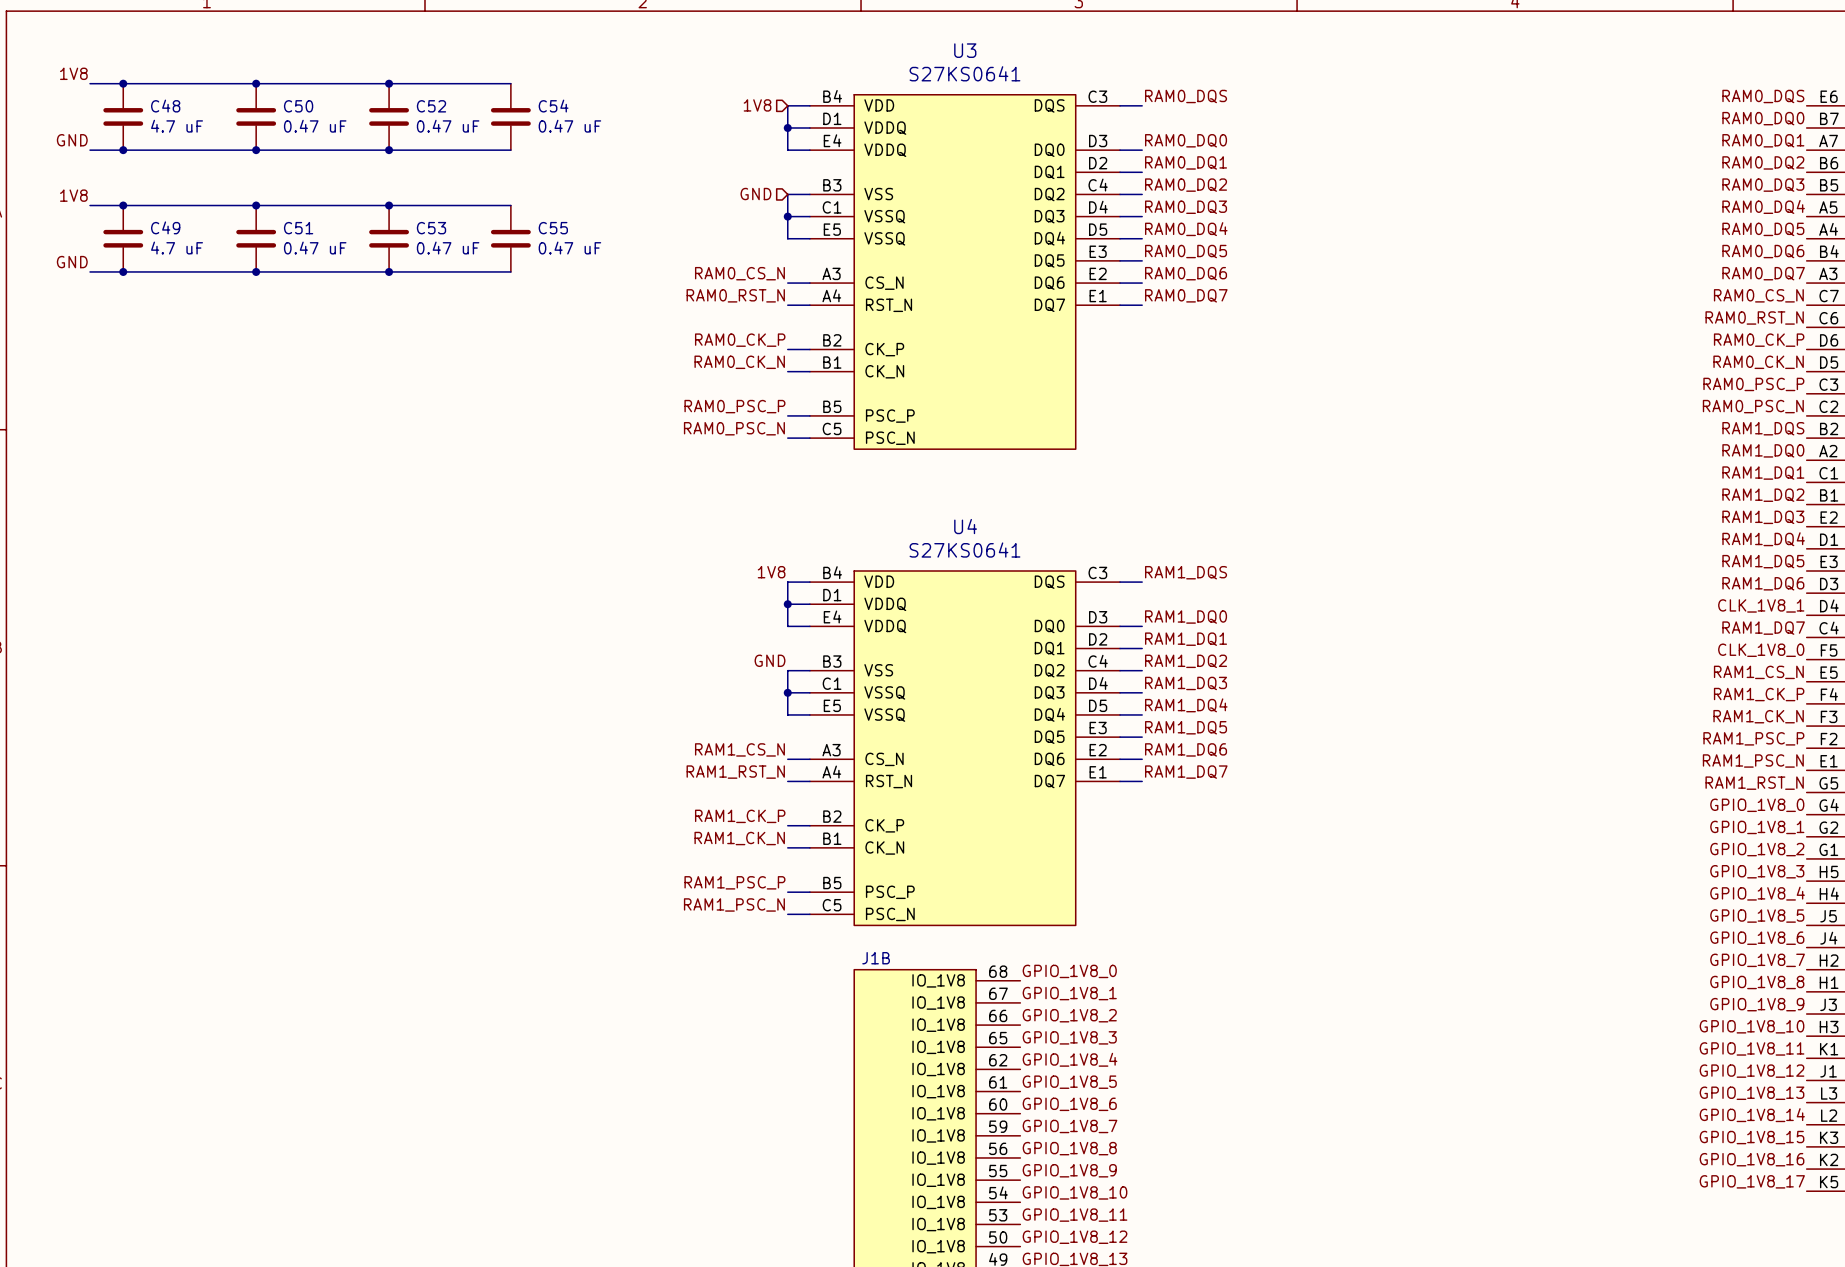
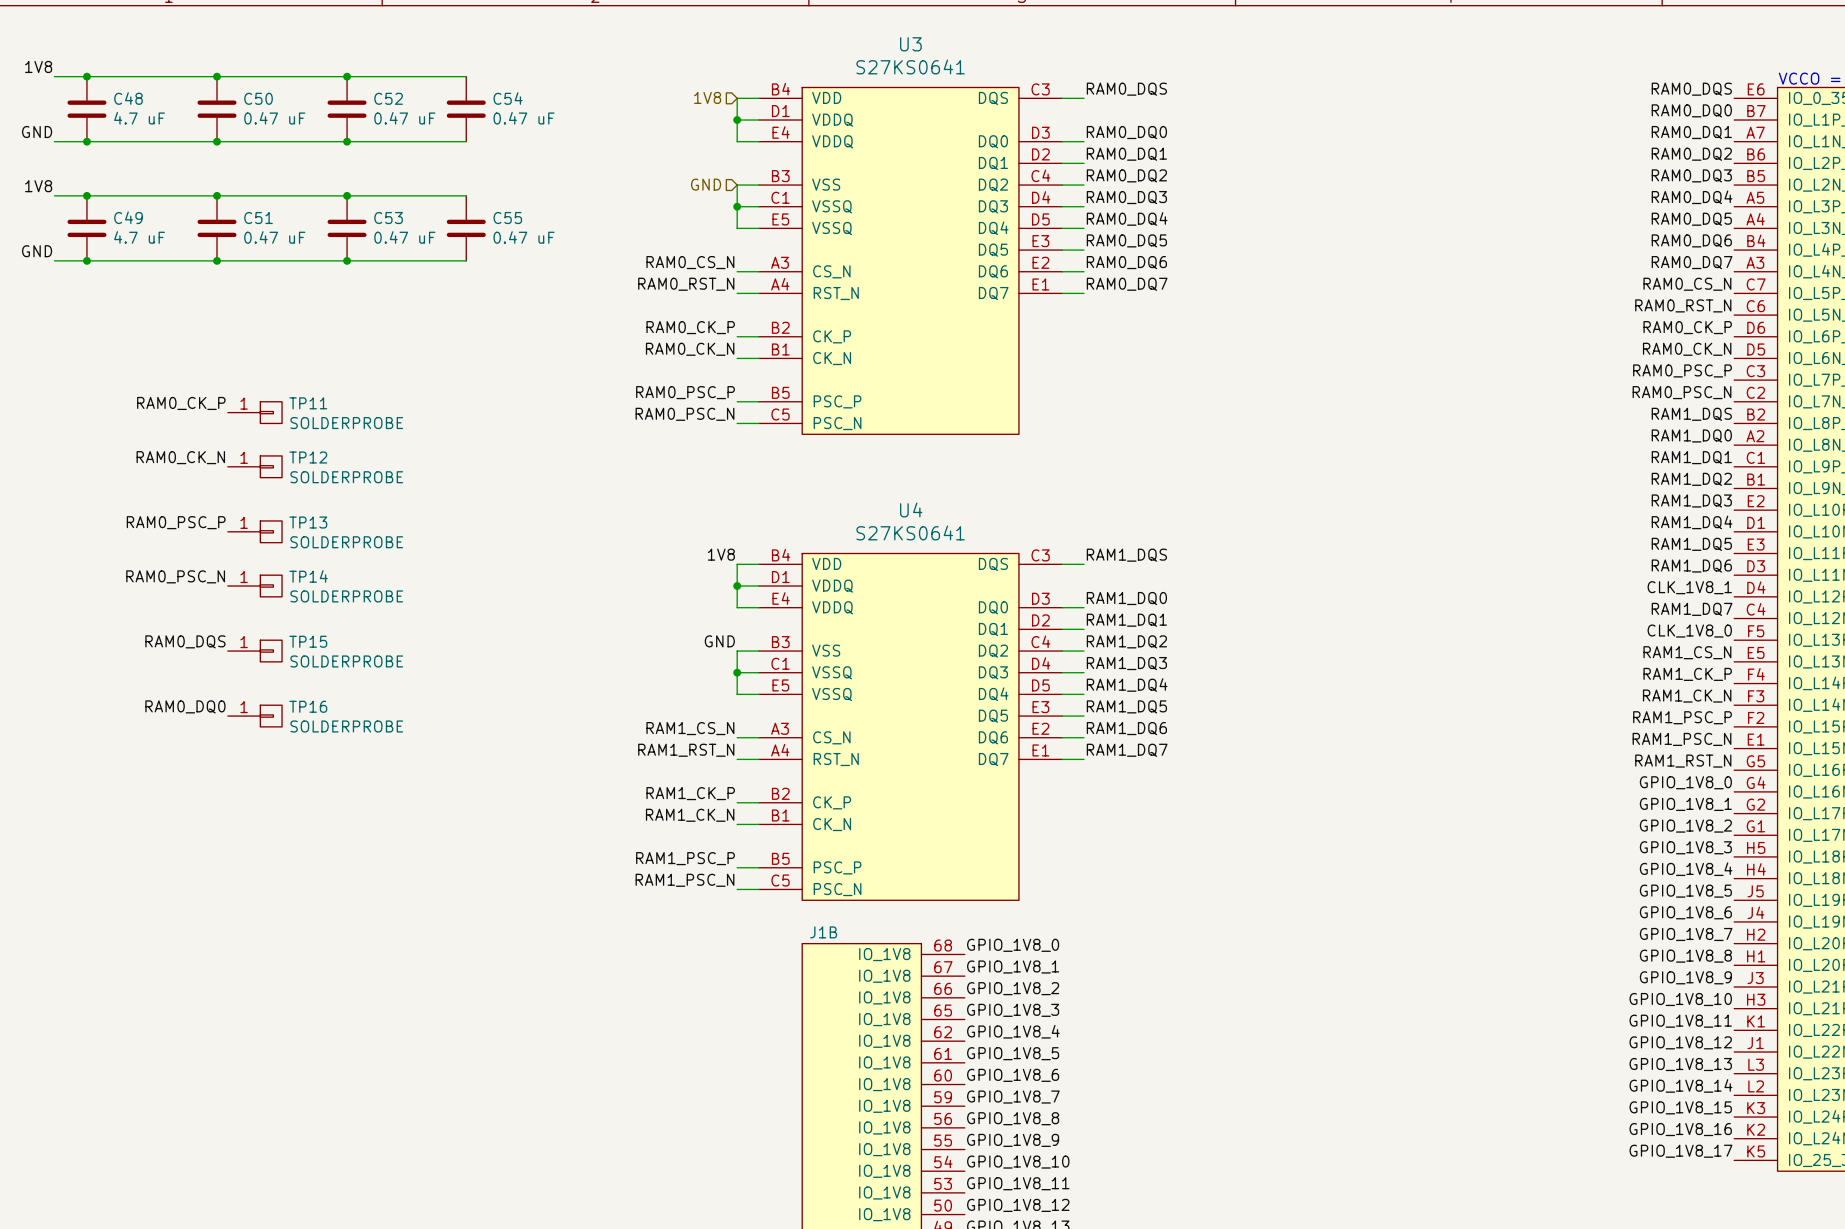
label: none -> RAM0_CK_P (181, 403)
TP11: none -> SOLDERPROBE (254, 412)
label: none -> RAM0_CK_N (180, 457)
TP12: none -> SOLDERPROBE (254, 466)
label: none -> RAM0_PSC_P (176, 522)
TP13: none -> SOLDERPROBE (254, 531)
label: none -> RAM0_PSC_N (175, 576)
TP14: none -> SOLDERPROBE (254, 586)
label: none -> RAM0_DQS (185, 641)
TP15: none -> SOLDERPROBE (254, 651)
label: none -> RAM0_DQ0 (185, 706)
TP16: none -> SOLDERPROBE (254, 716)

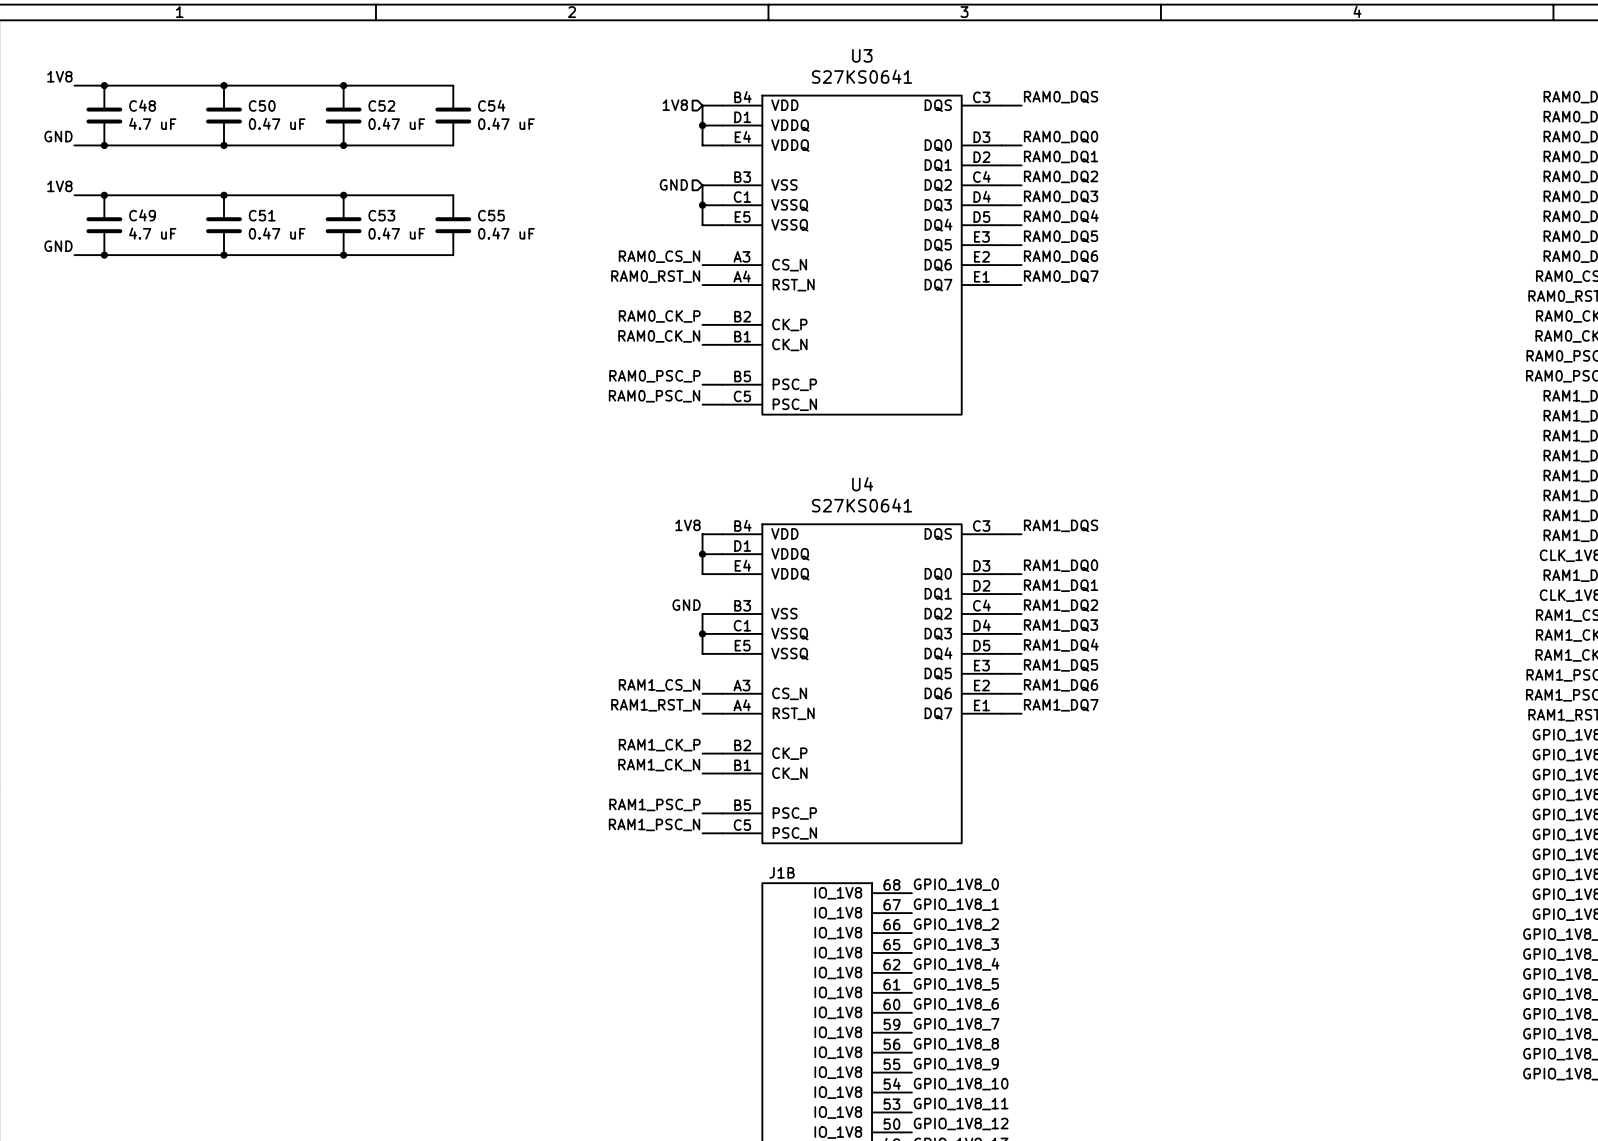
label: RAM0_CK_P (181, 403) -> none
TP11: SOLDERPROBE (254, 412) -> none
label: RAM0_CK_N (180, 457) -> none
TP12: SOLDERPROBE (254, 466) -> none
label: RAM0_PSC_P (176, 522) -> none
TP13: SOLDERPROBE (254, 531) -> none
label: RAM0_PSC_N (175, 576) -> none
TP14: SOLDERPROBE (254, 586) -> none
label: RAM0_DQS (185, 641) -> none
TP15: SOLDERPROBE (254, 651) -> none
label: RAM0_DQ0 (185, 706) -> none
TP16: SOLDERPROBE (254, 716) -> none

